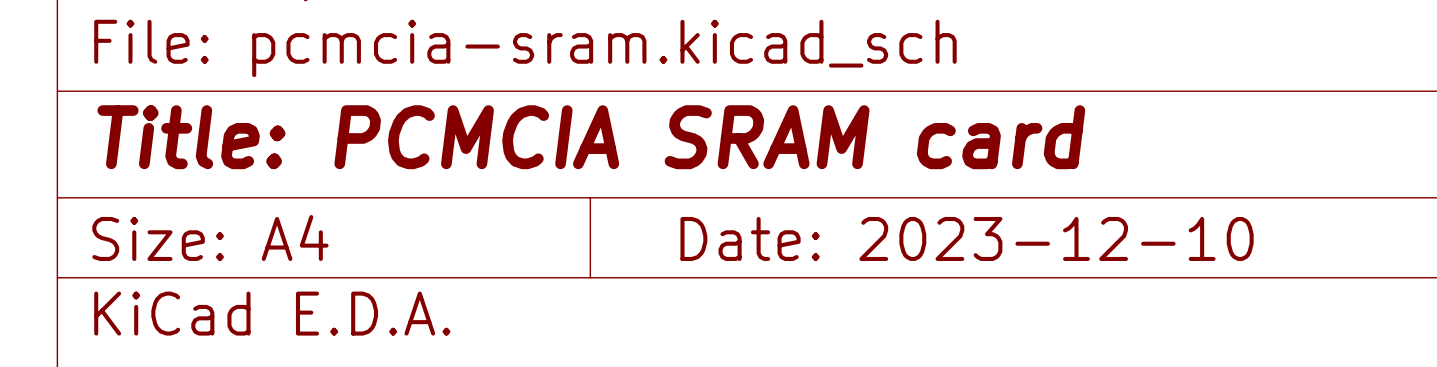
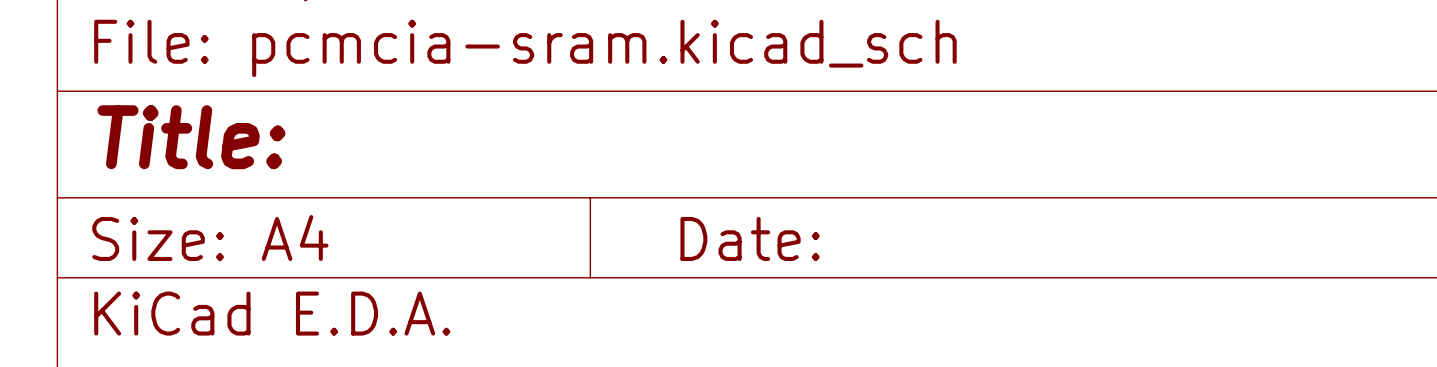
title block: Title: PCMCIA SRAM card (591, 137) -> Title: (191, 137)
title block: Date: 2023-12-10 (967, 238) -> Date: (750, 238)

